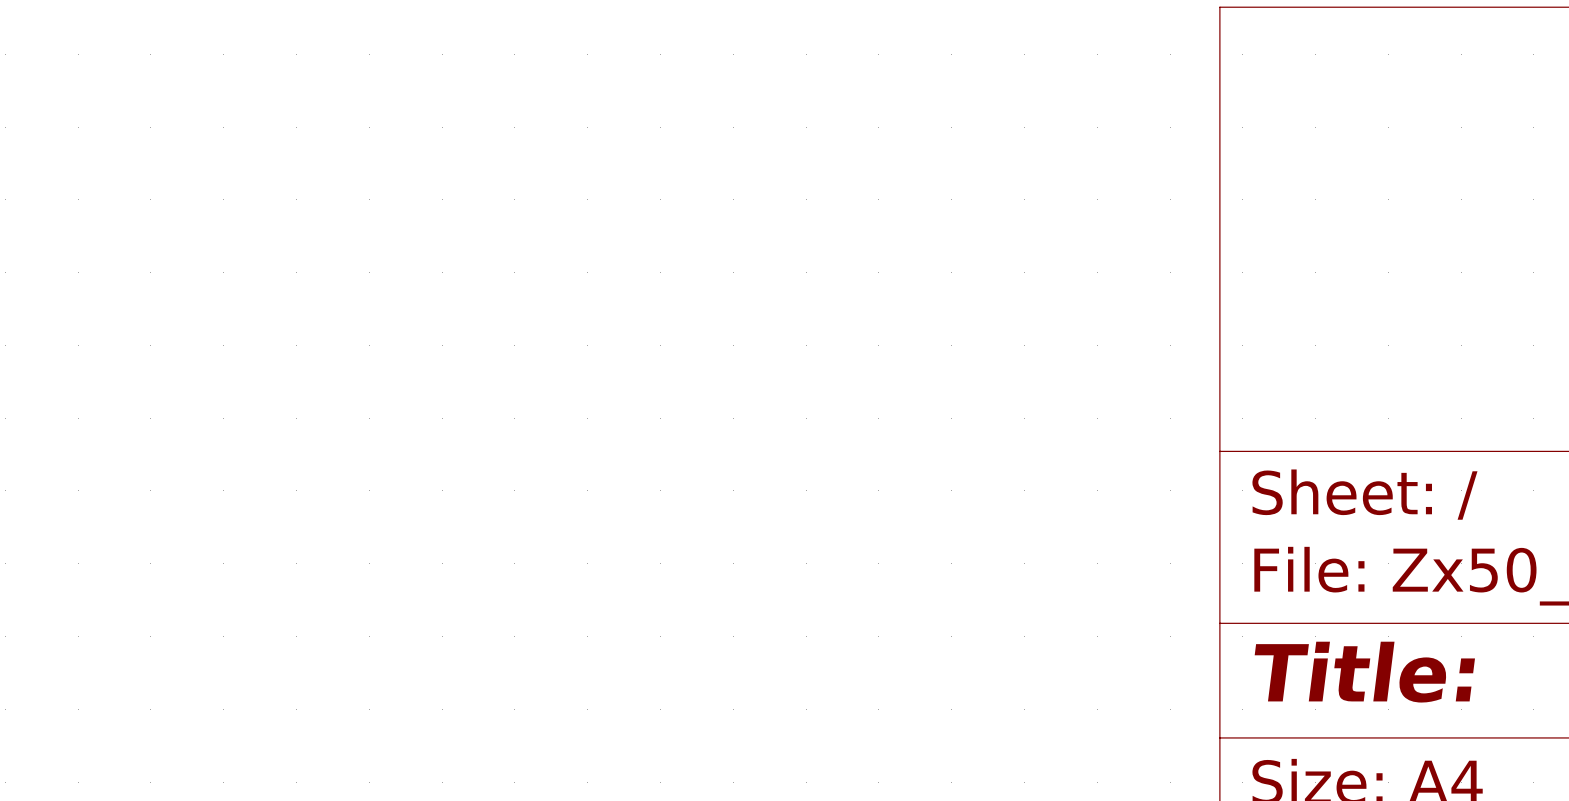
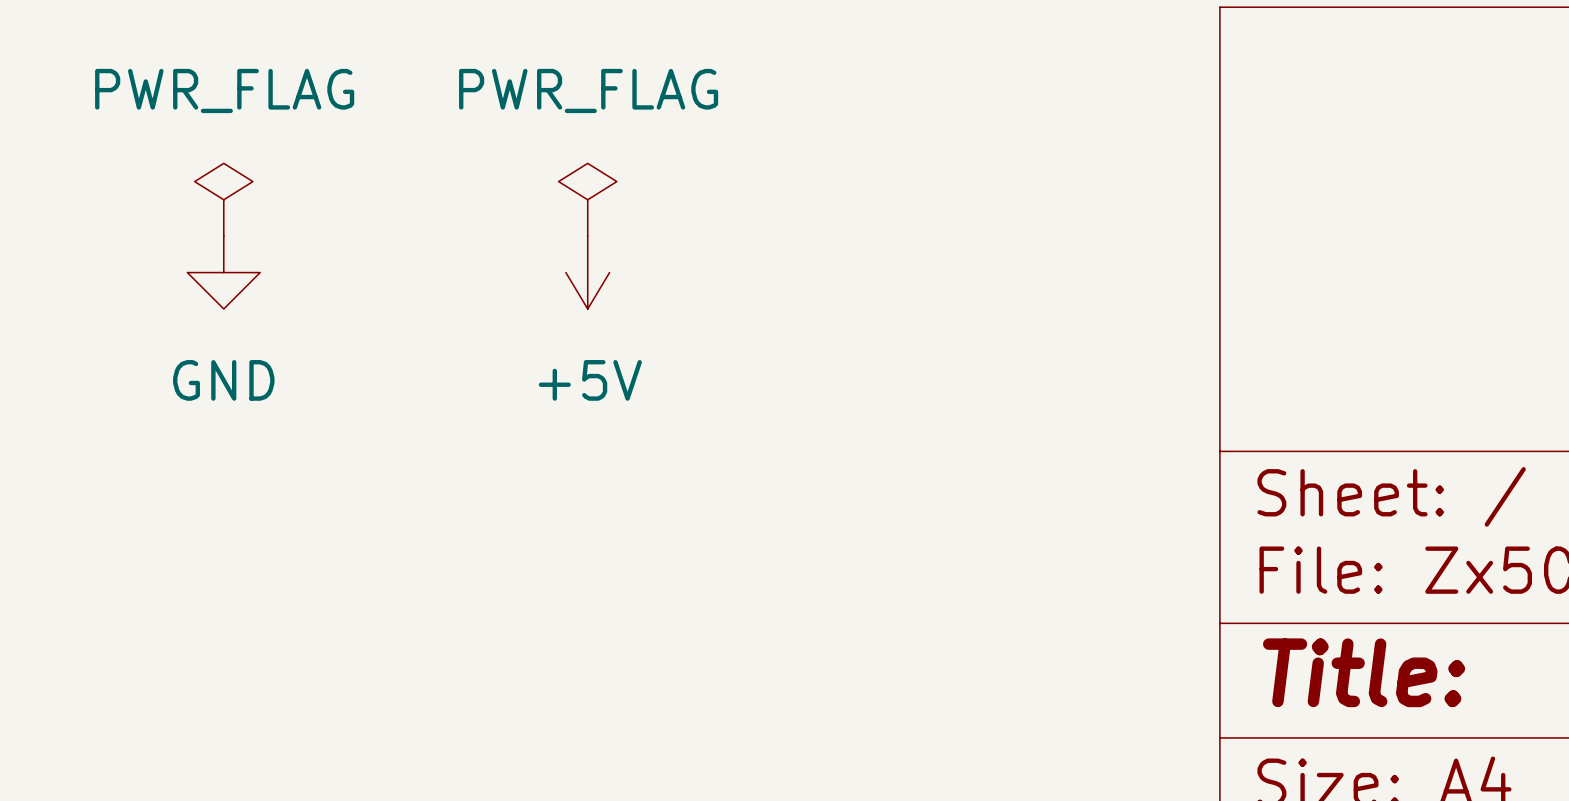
power symbol: none -> PWR_FLAG (223, 199)
power symbol: none -> PWR_FLAG (587, 199)
power symbol: none -> GND (223, 272)
power symbol: none -> +5V (587, 272)

